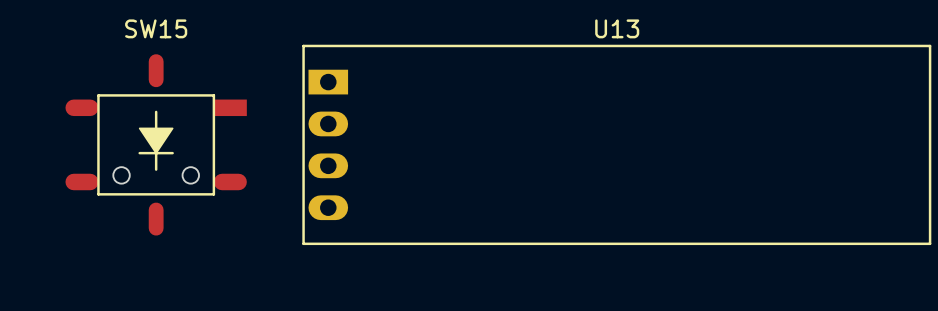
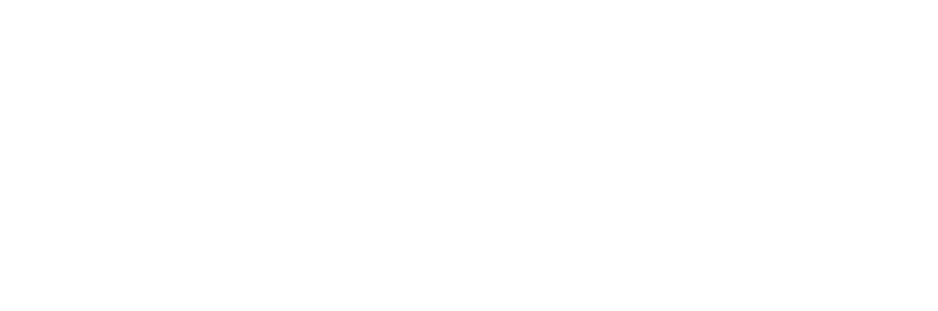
SW15: (156, 144) -> none
U13: (616, 144) -> none

